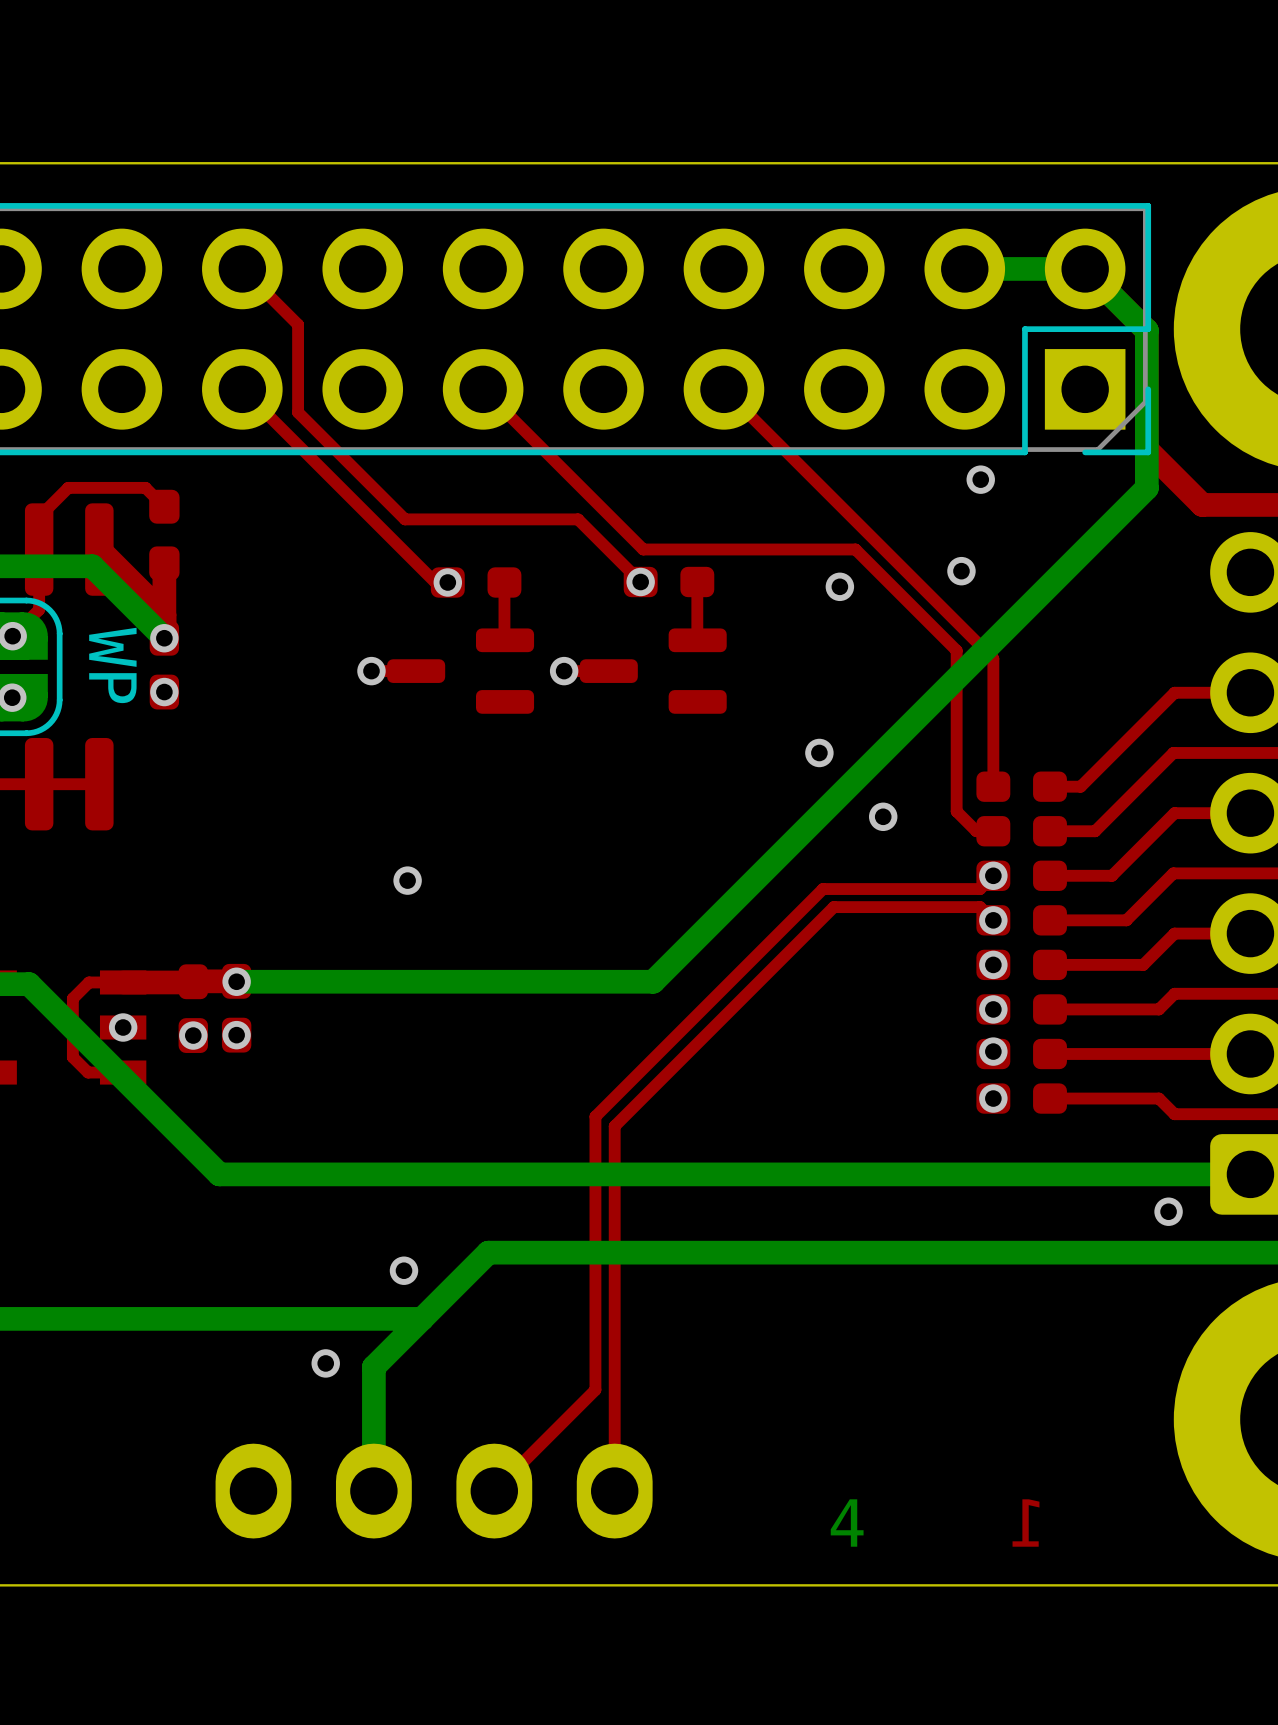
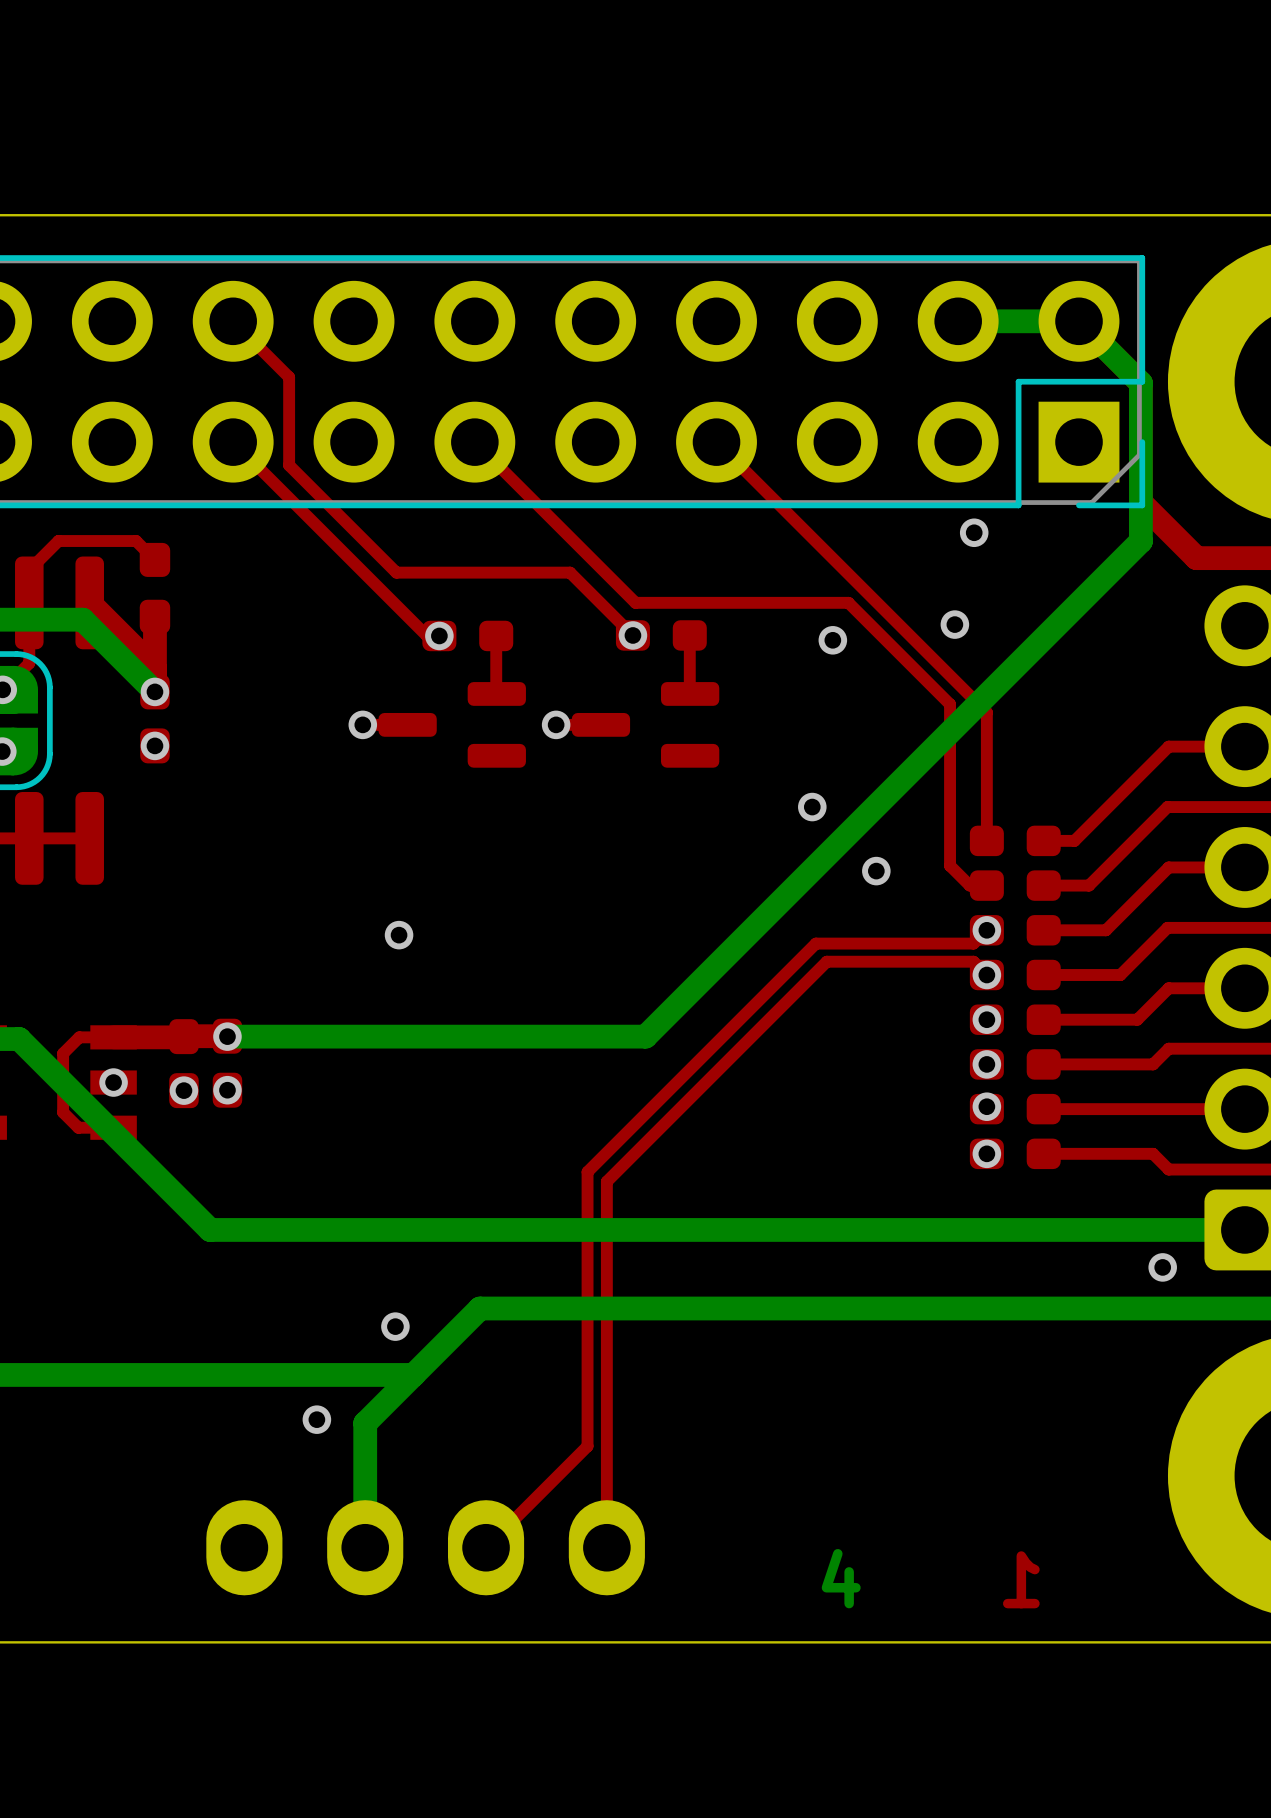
text: WP (112, 665) -> none

